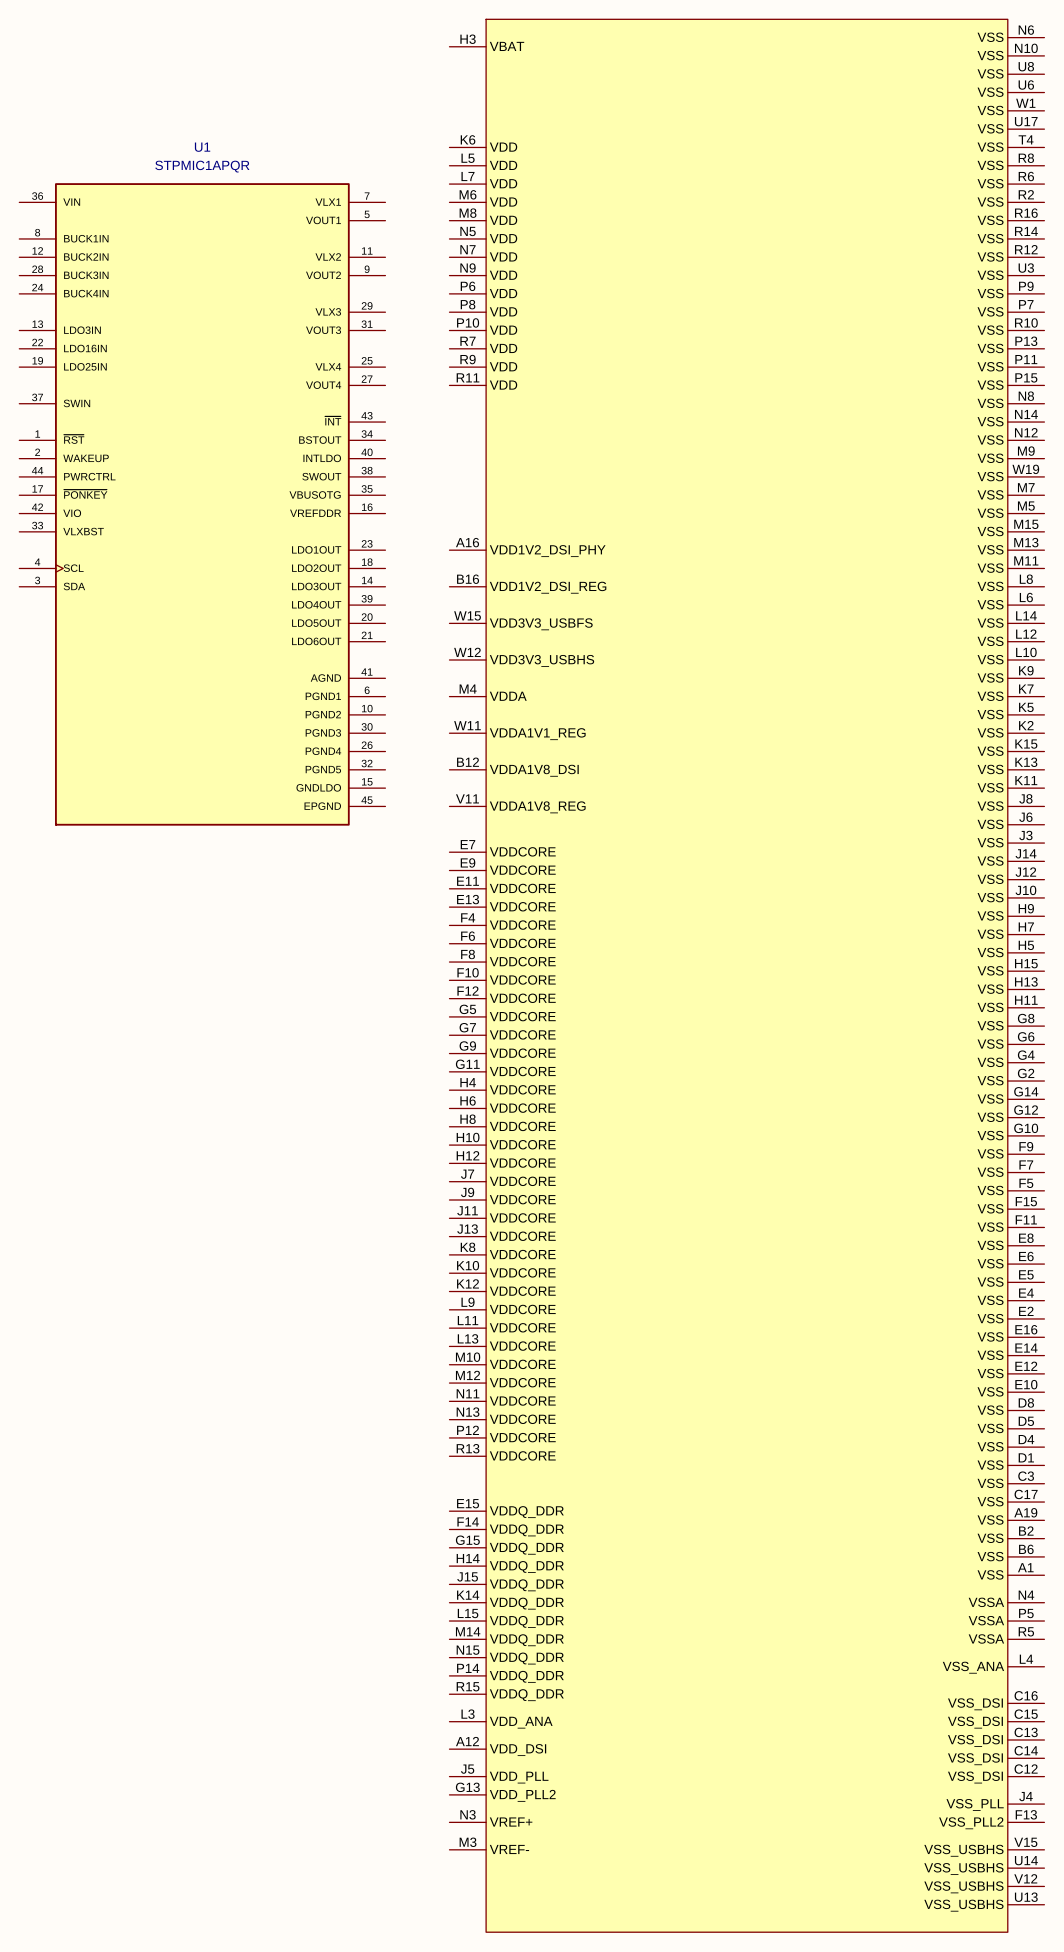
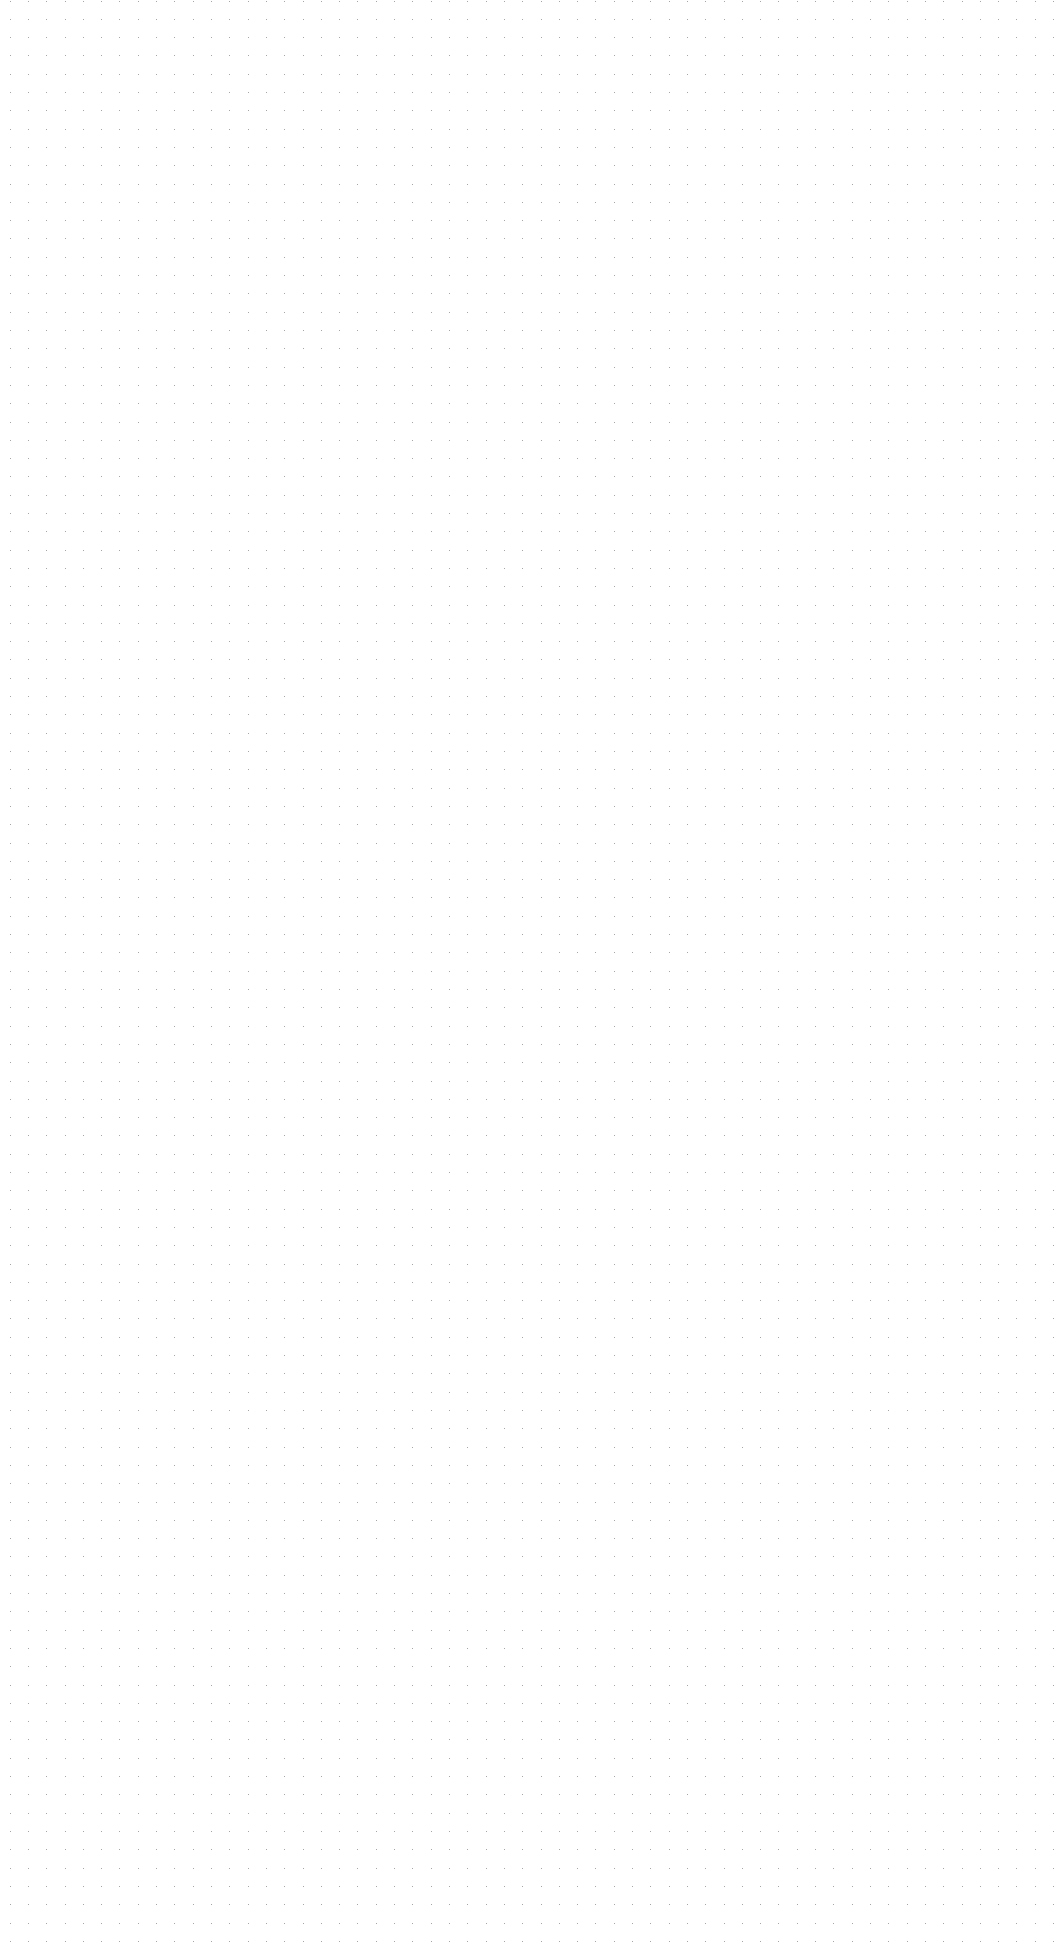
U1: STPMIC1APQR (202, 504) -> none
part: (746, 975) -> none

